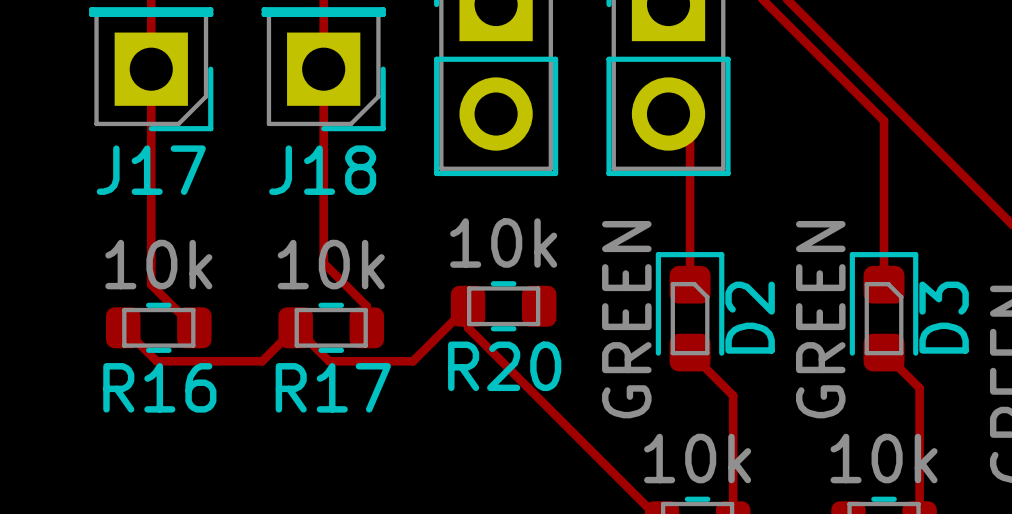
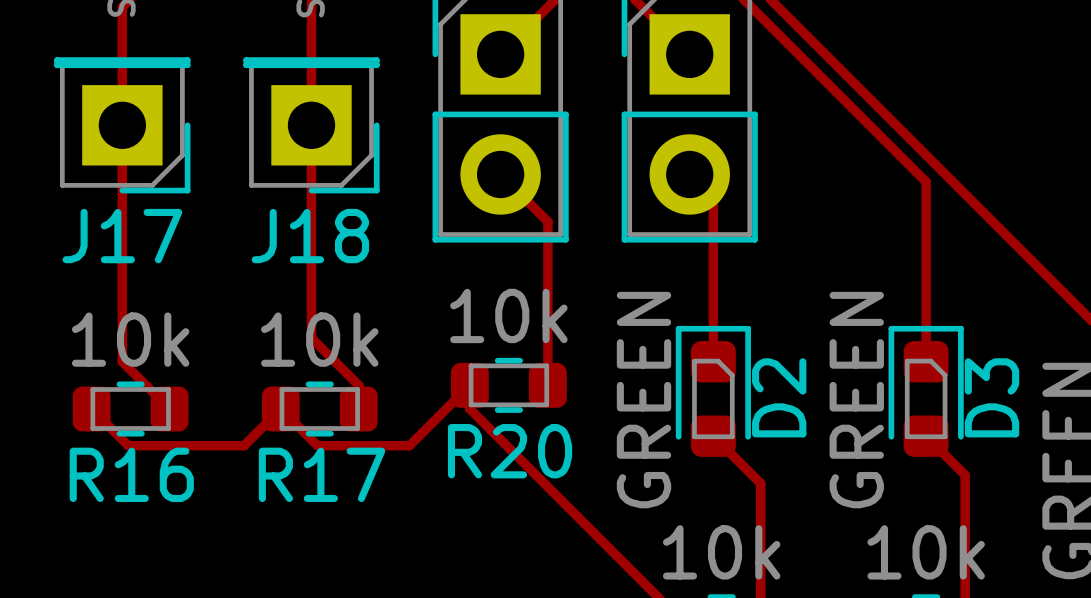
track: none -> (500, 174) (547, 221) (547, 385)

